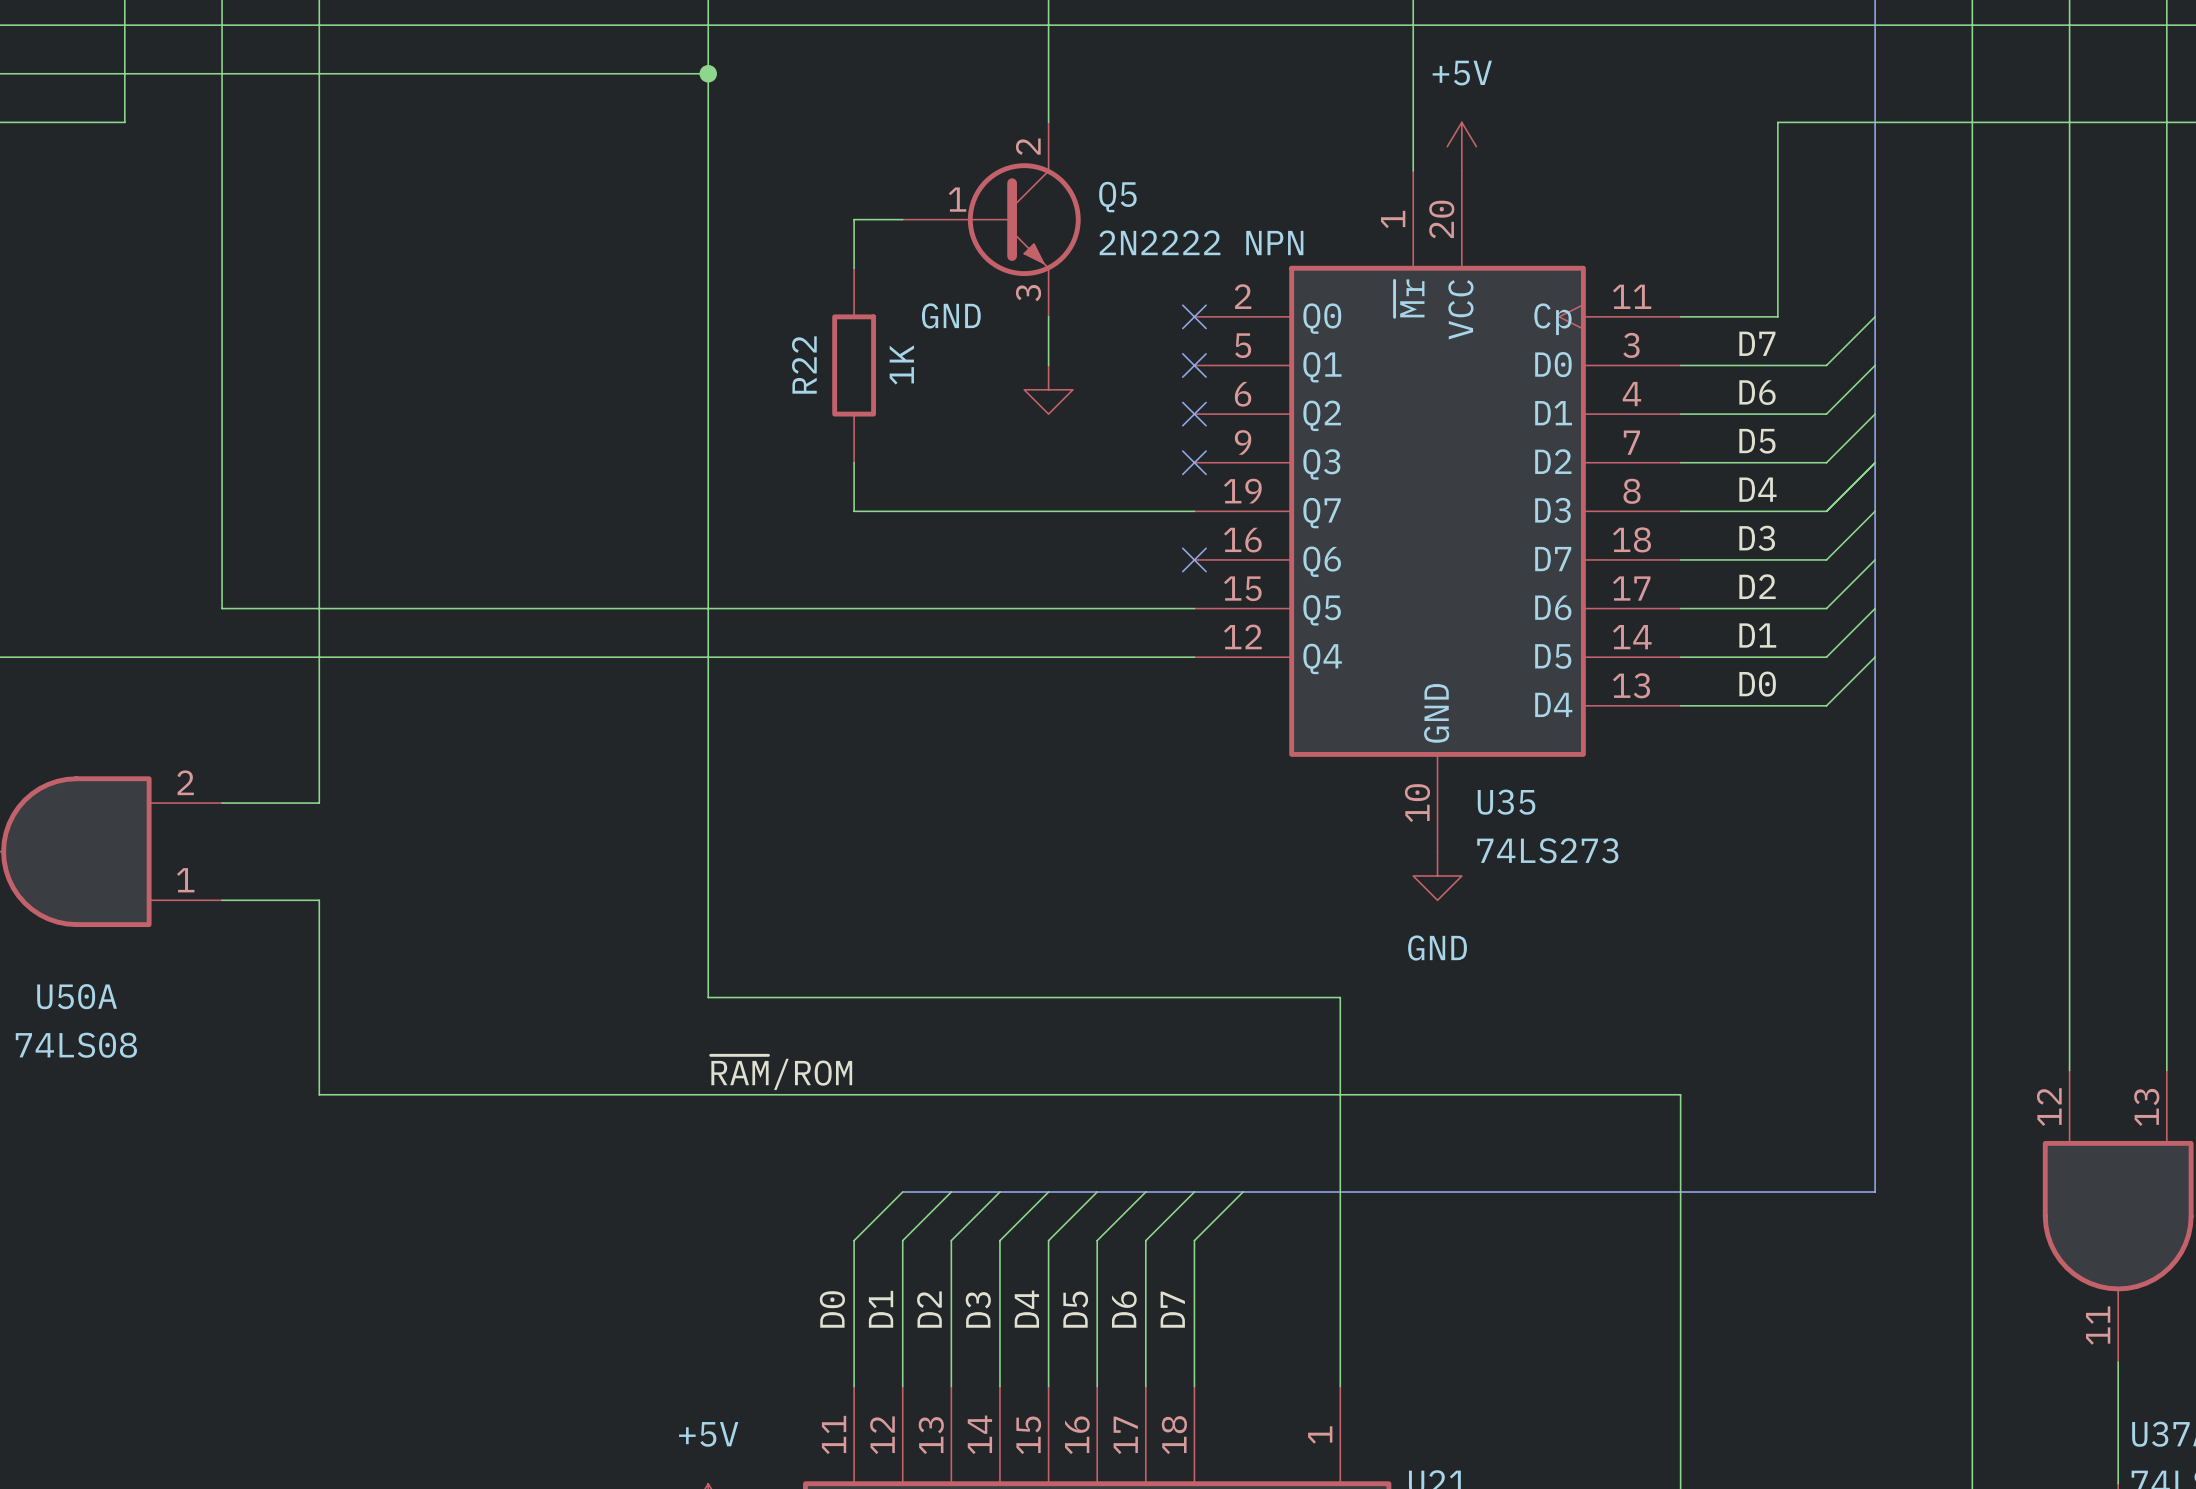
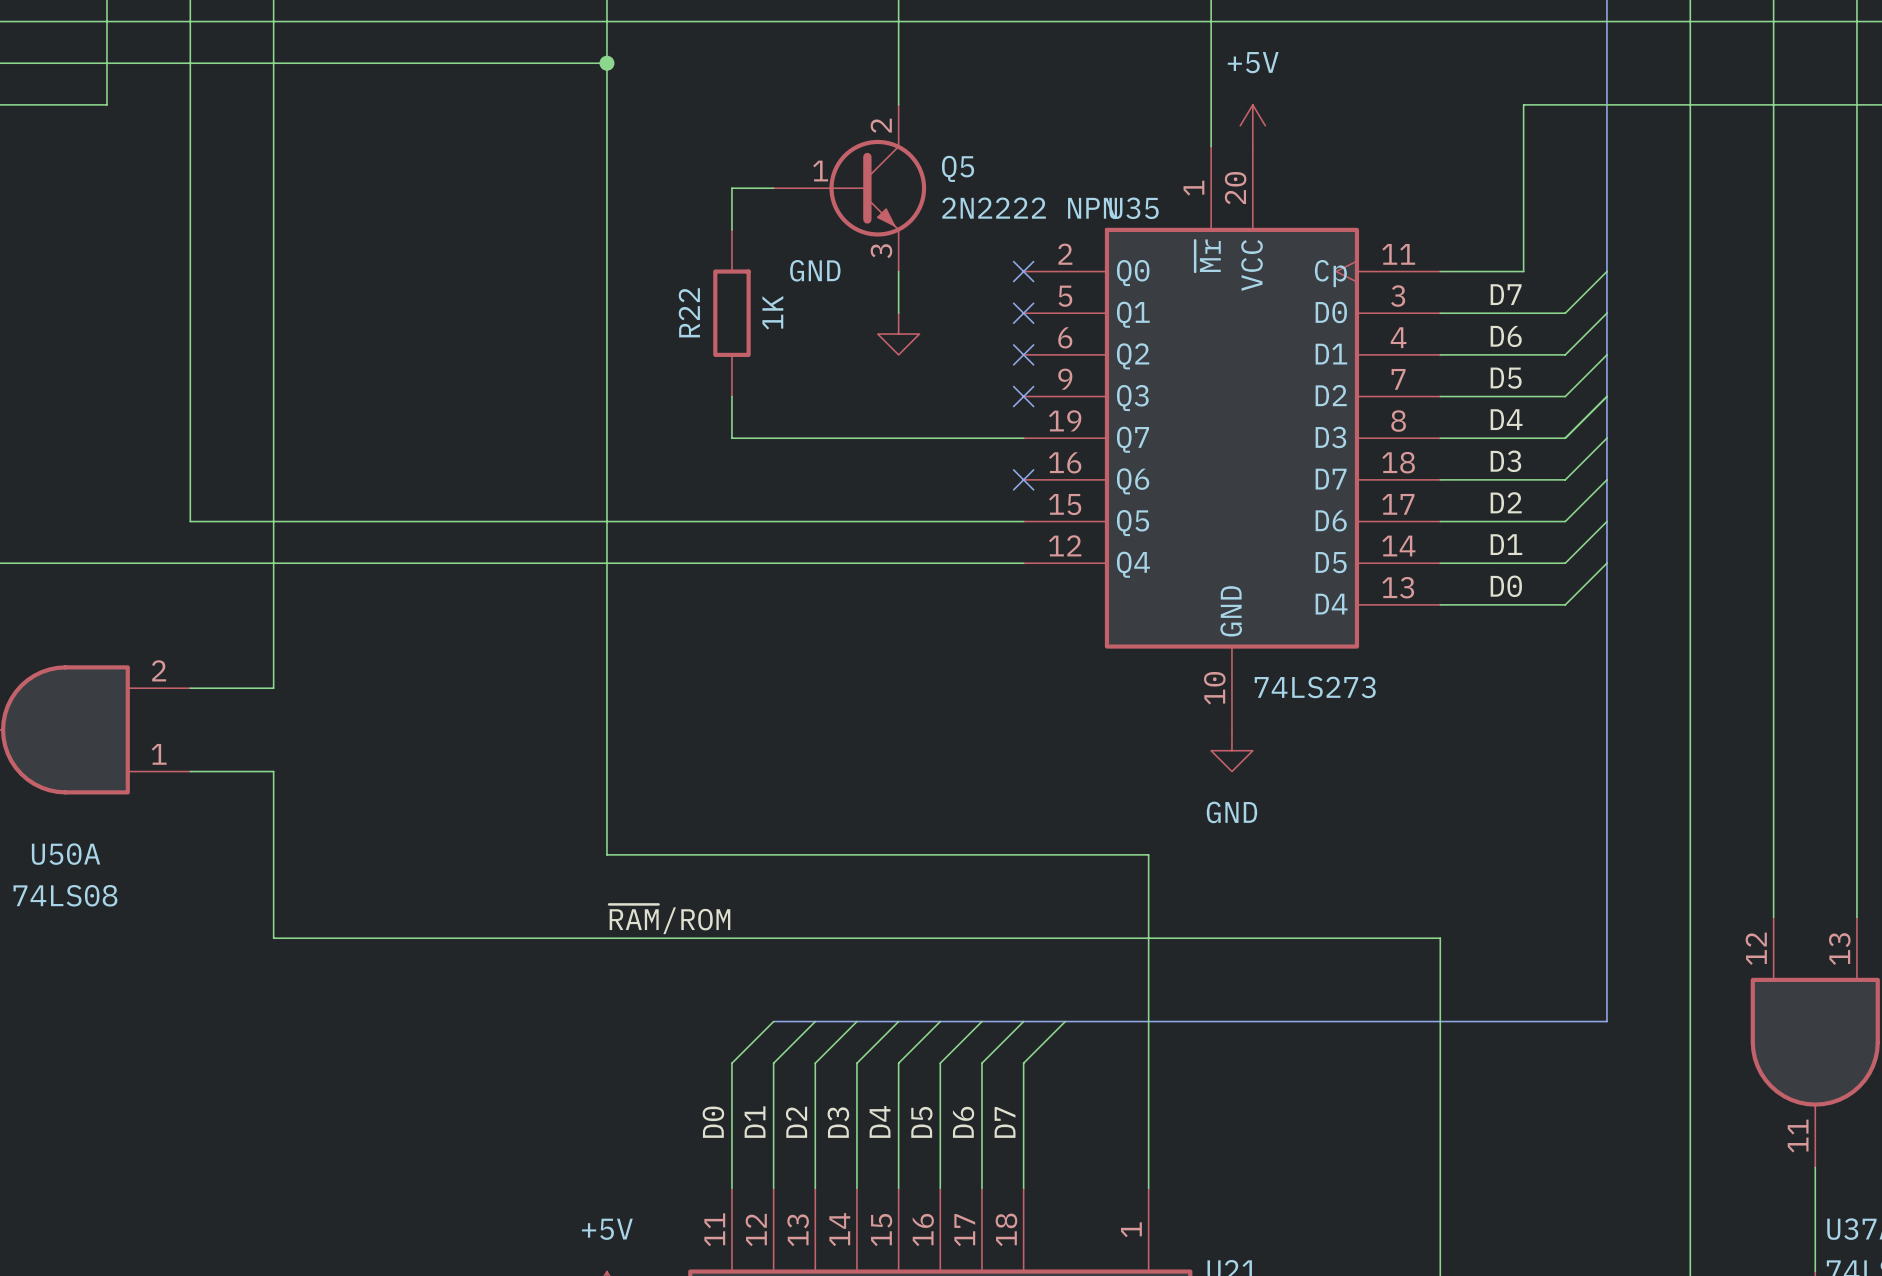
U35 name position: U35 (1506, 802) -> U35 (1134, 208)
U35 value position: 74LS273 (1547, 850) -> 74LS273 (1315, 687)

